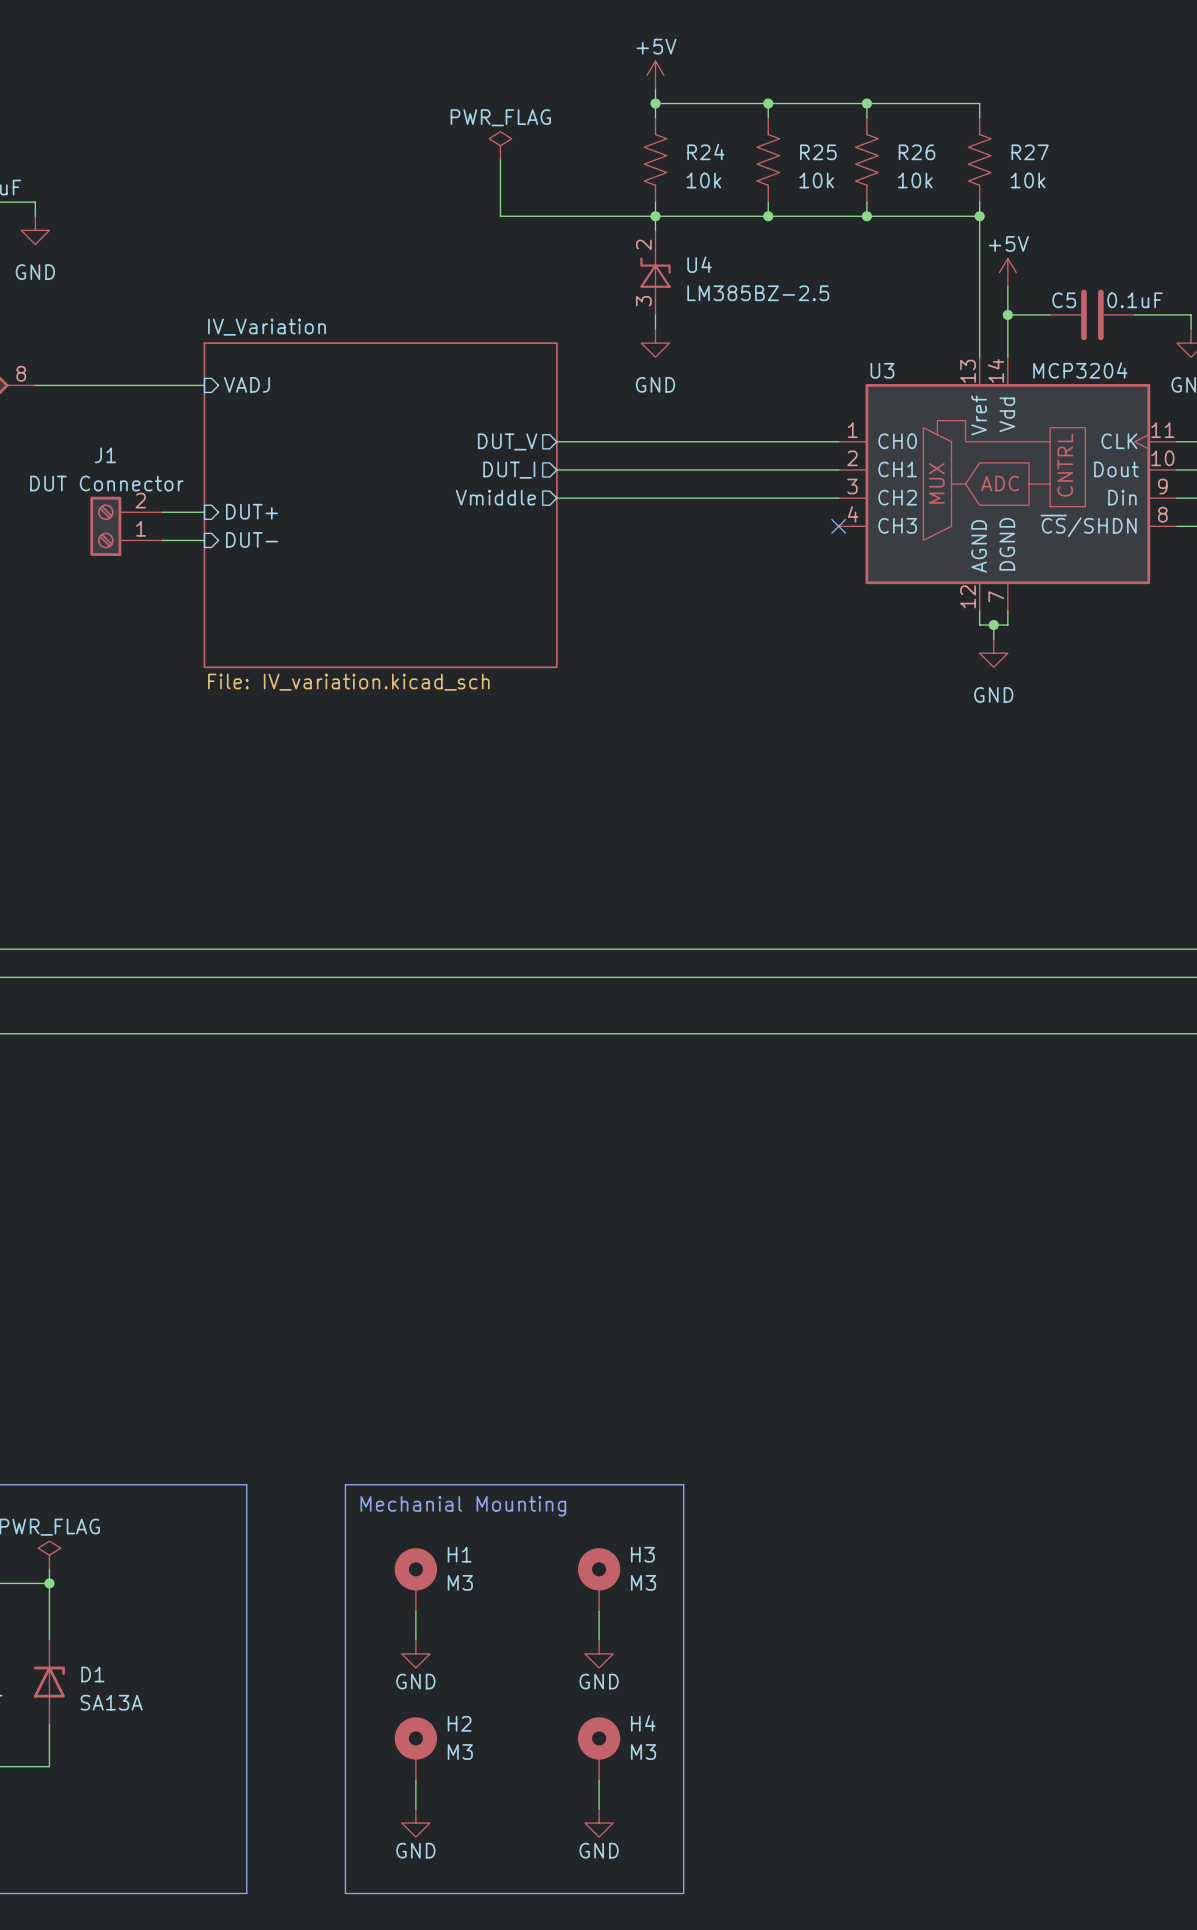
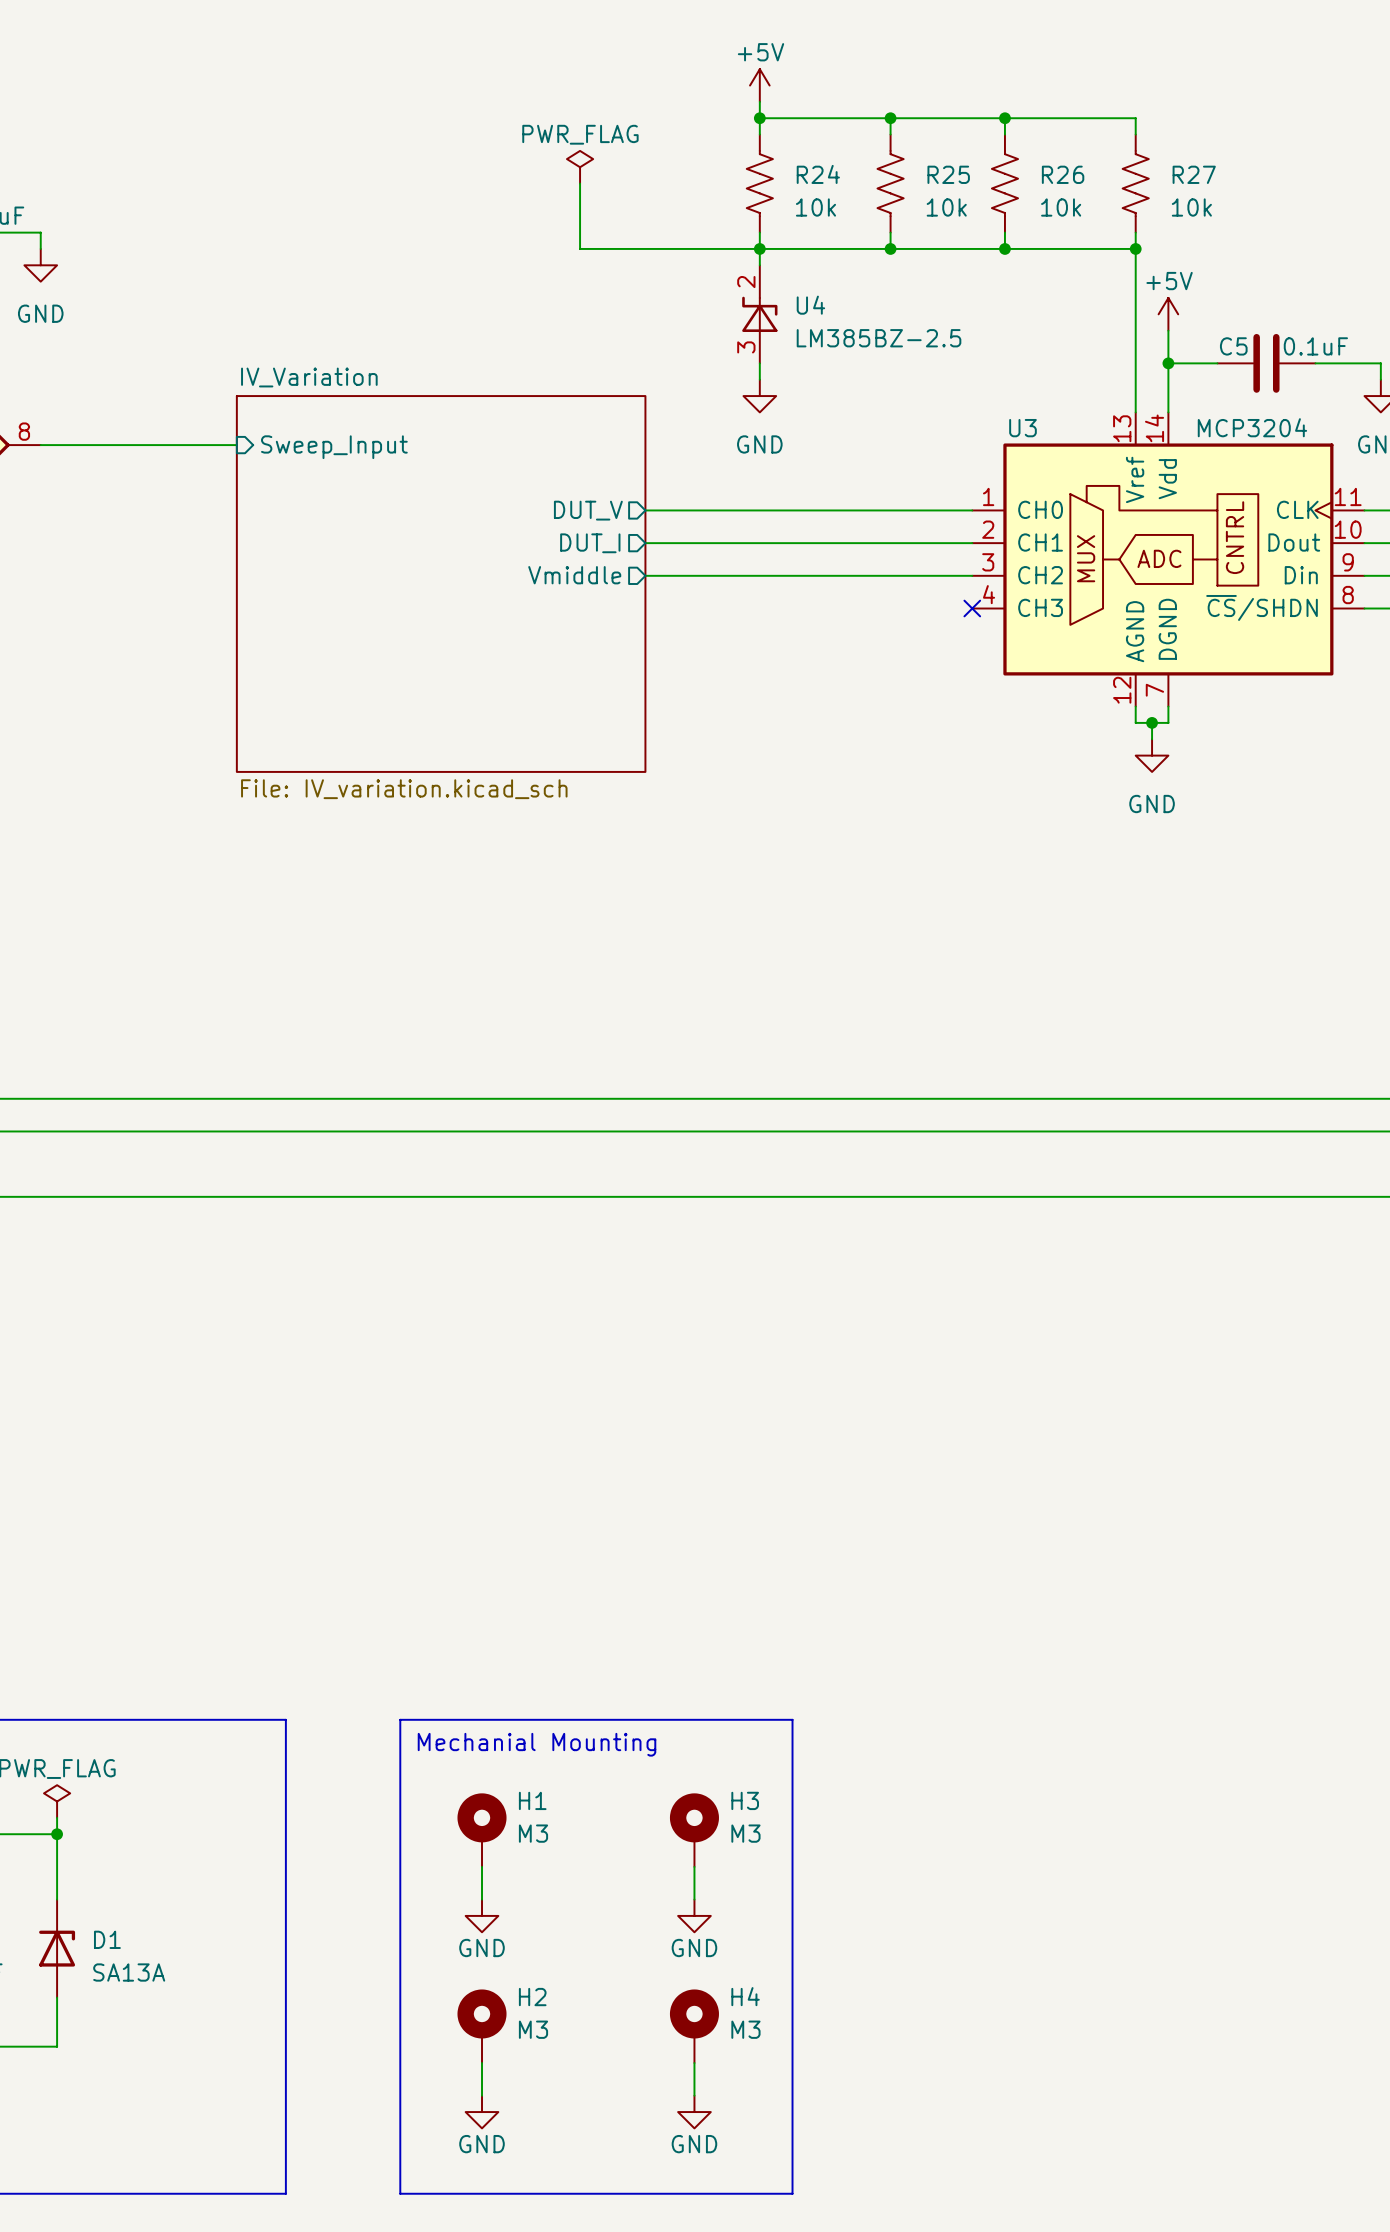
sheet pin: VADJ (246, 384) -> Sweep_Input (334, 447)
sheet pin: DUT+ (252, 511) -> none
wire: (162, 512) (204, 512) -> none
J1: DUT Connector (126, 526) -> none
sheet pin: DUT- (252, 539) -> none
wire: (162, 540) (204, 540) -> none

